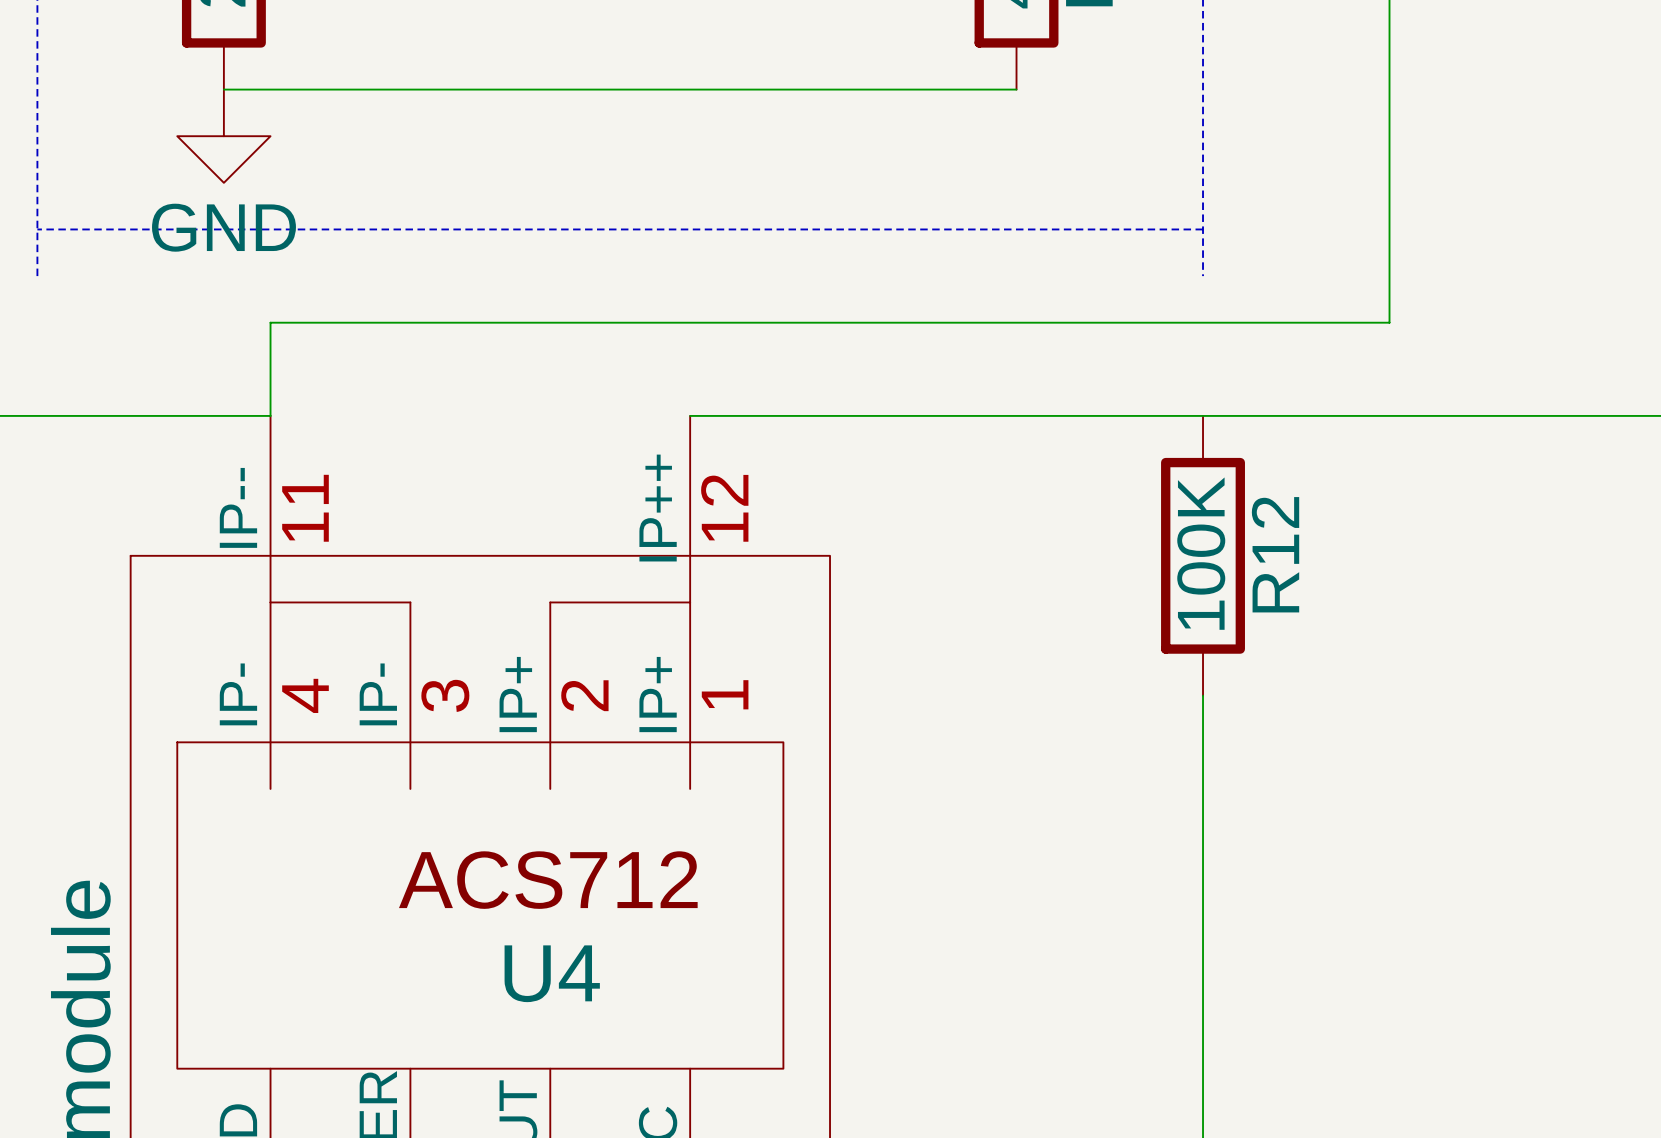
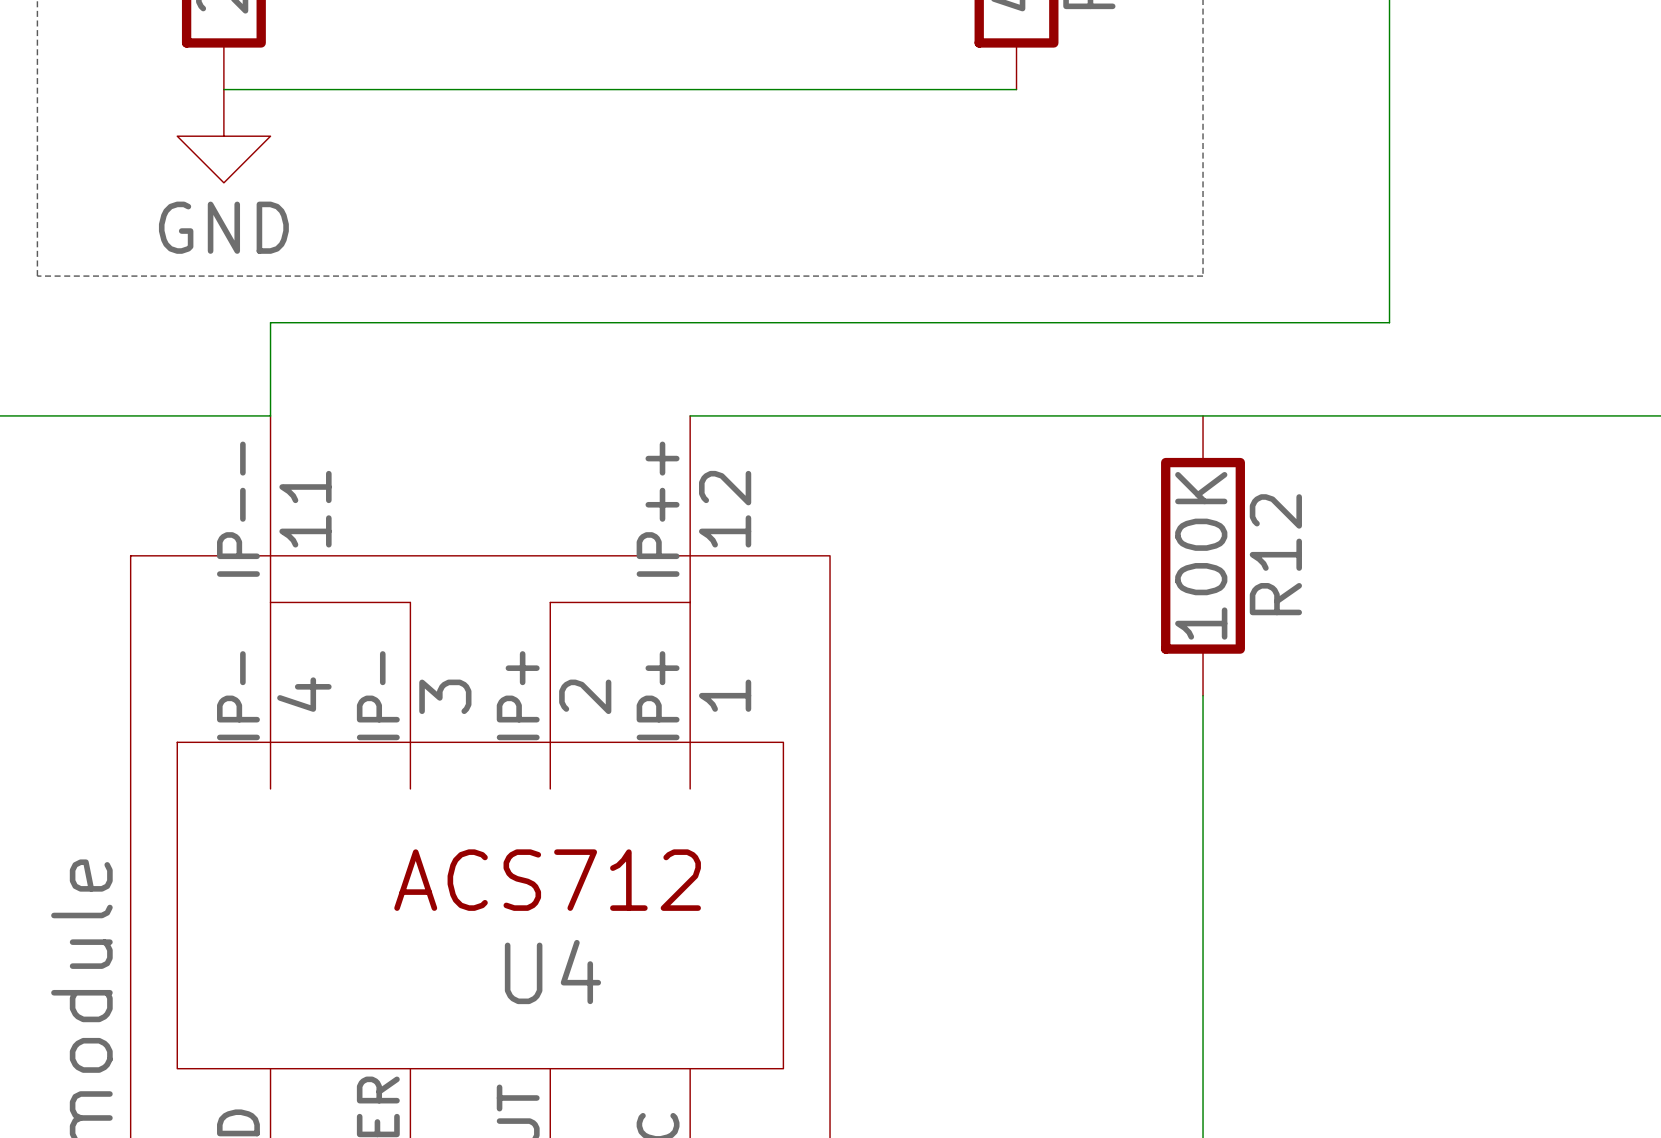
line: (37, 229) (1203, 229) -> (37, 276) (1203, 276)

